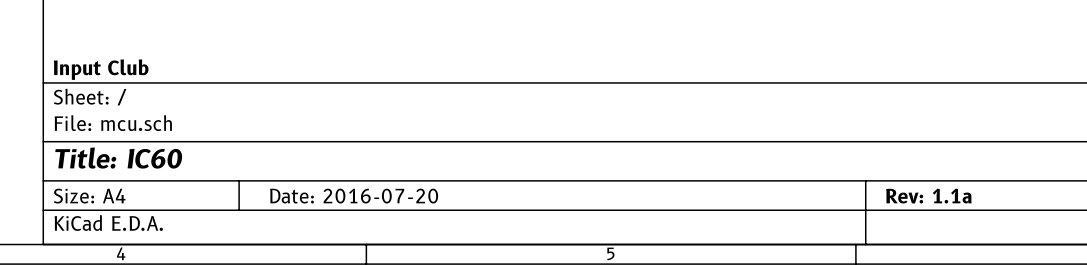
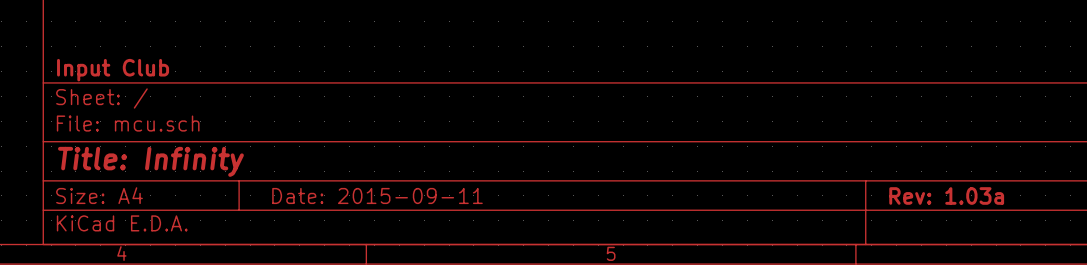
title block: Title: IC60 (118, 158) -> Title: Infinity (150, 161)
title block: Date: 2016-07-20 (354, 196) -> Date: 2015-09-11 (377, 195)
title block: Rev: 1.1a (928, 196) -> Rev: 1.03a (946, 195)

